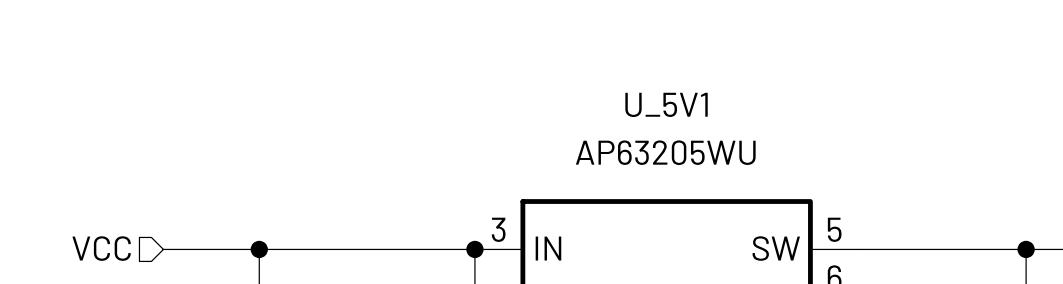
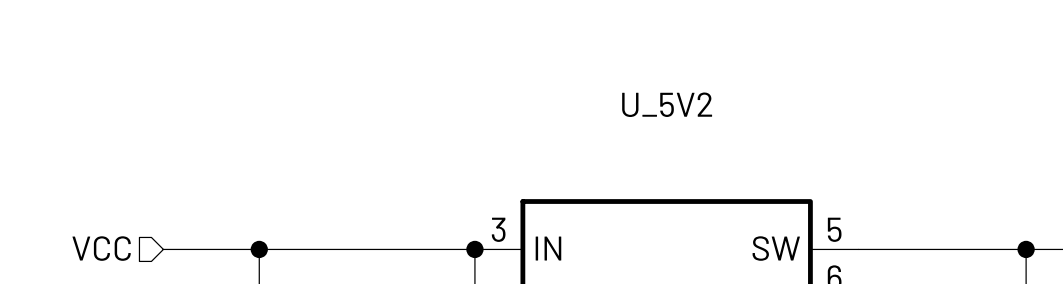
U_5V1 name: U_5V1 (666, 104) -> U_5V2 (667, 104)
U_5V1 value: AP63205WU (665, 152) -> none

